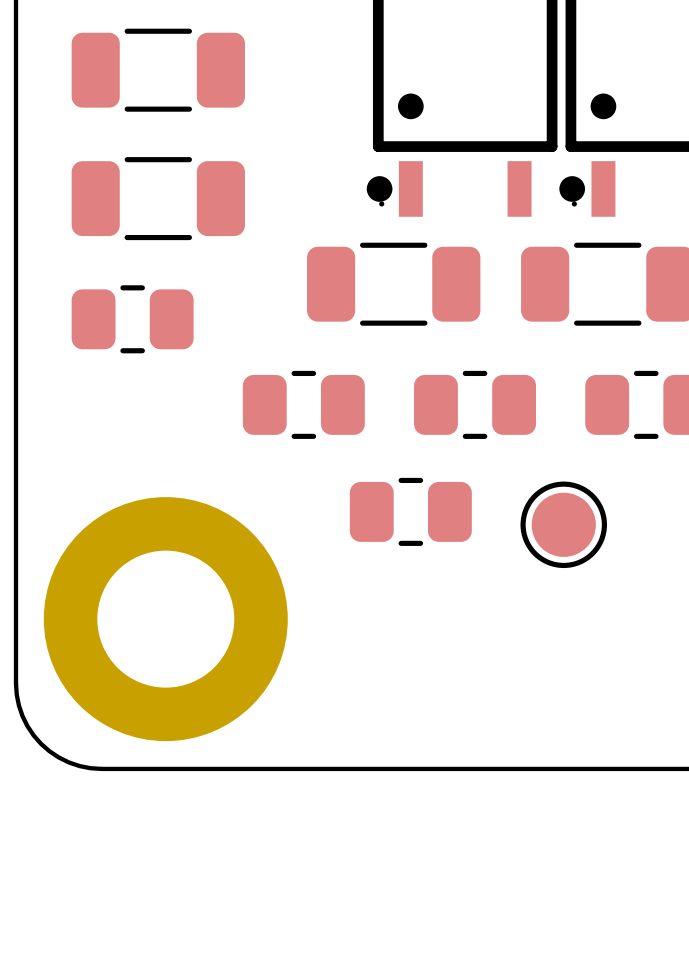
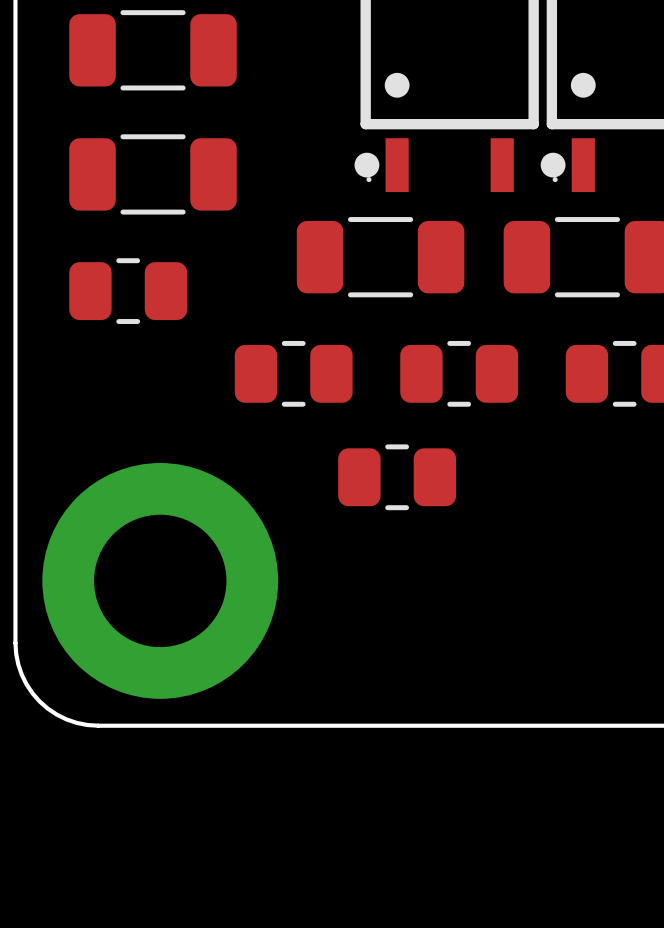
part: (563, 524) -> none

